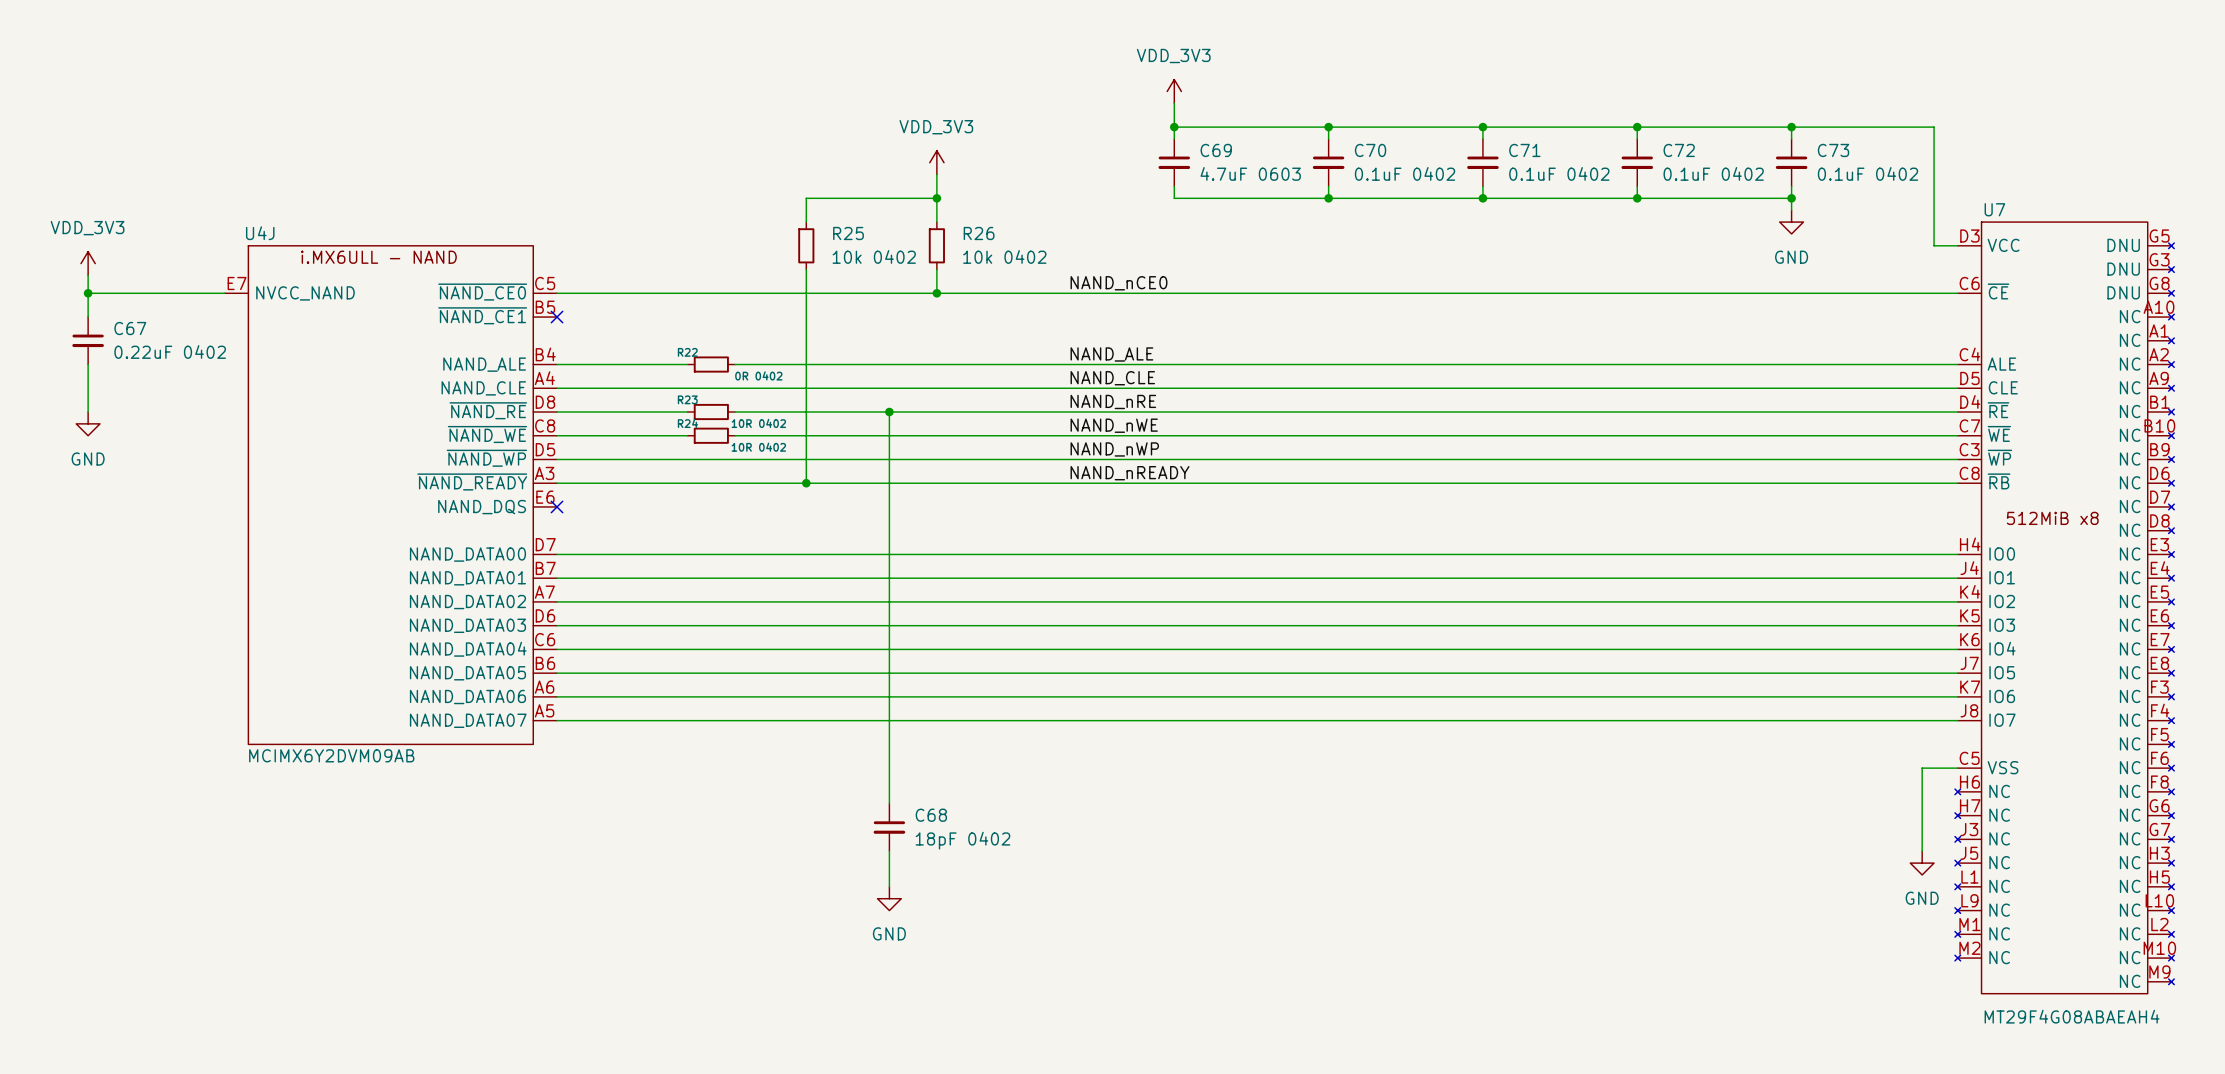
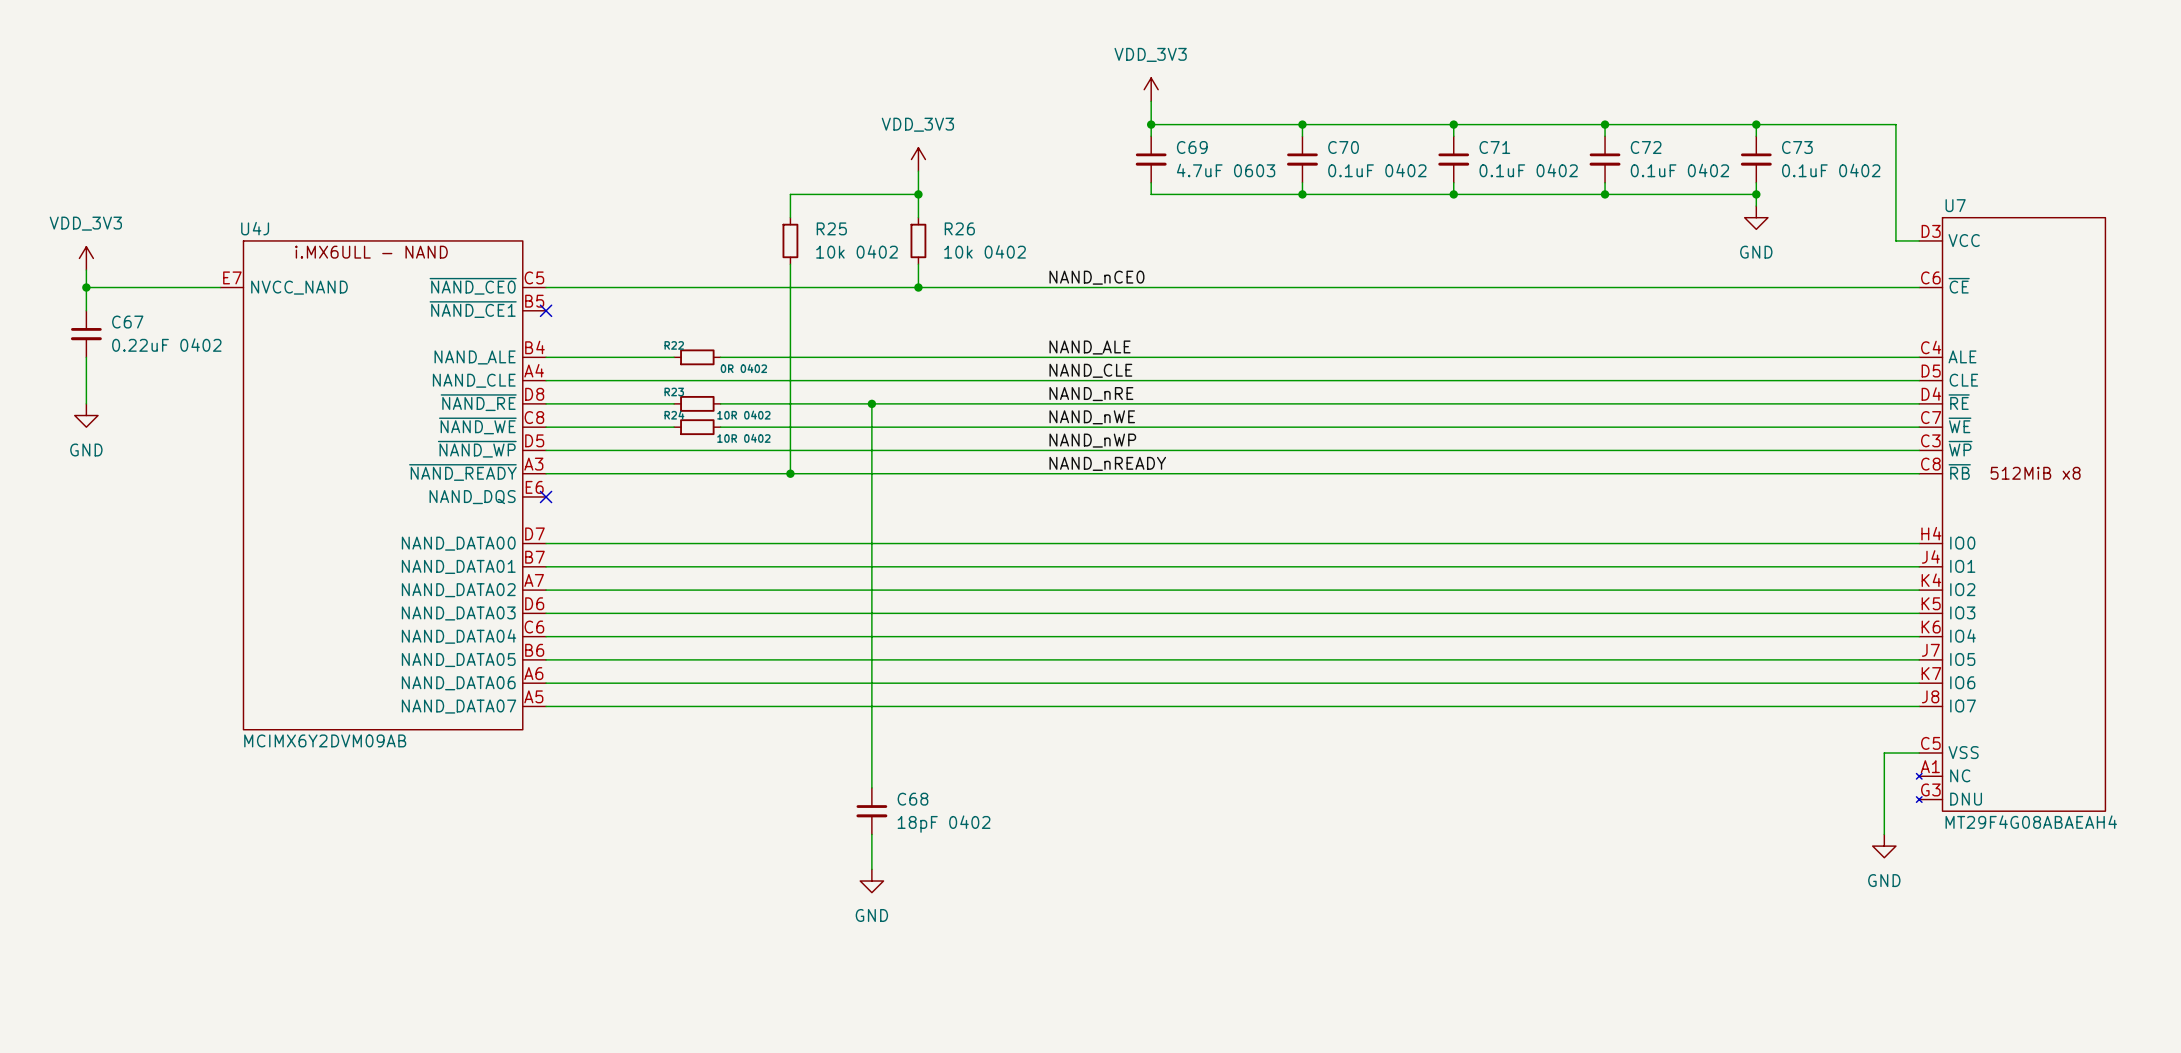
U7 symbol: [1954, 222, 2175, 994] -> [1916, 217, 2106, 812]
U7 value position: MT29F4G08ABAEAH4 (2072, 1016) -> MT29F4G08ABAEAH4 (2031, 822)

